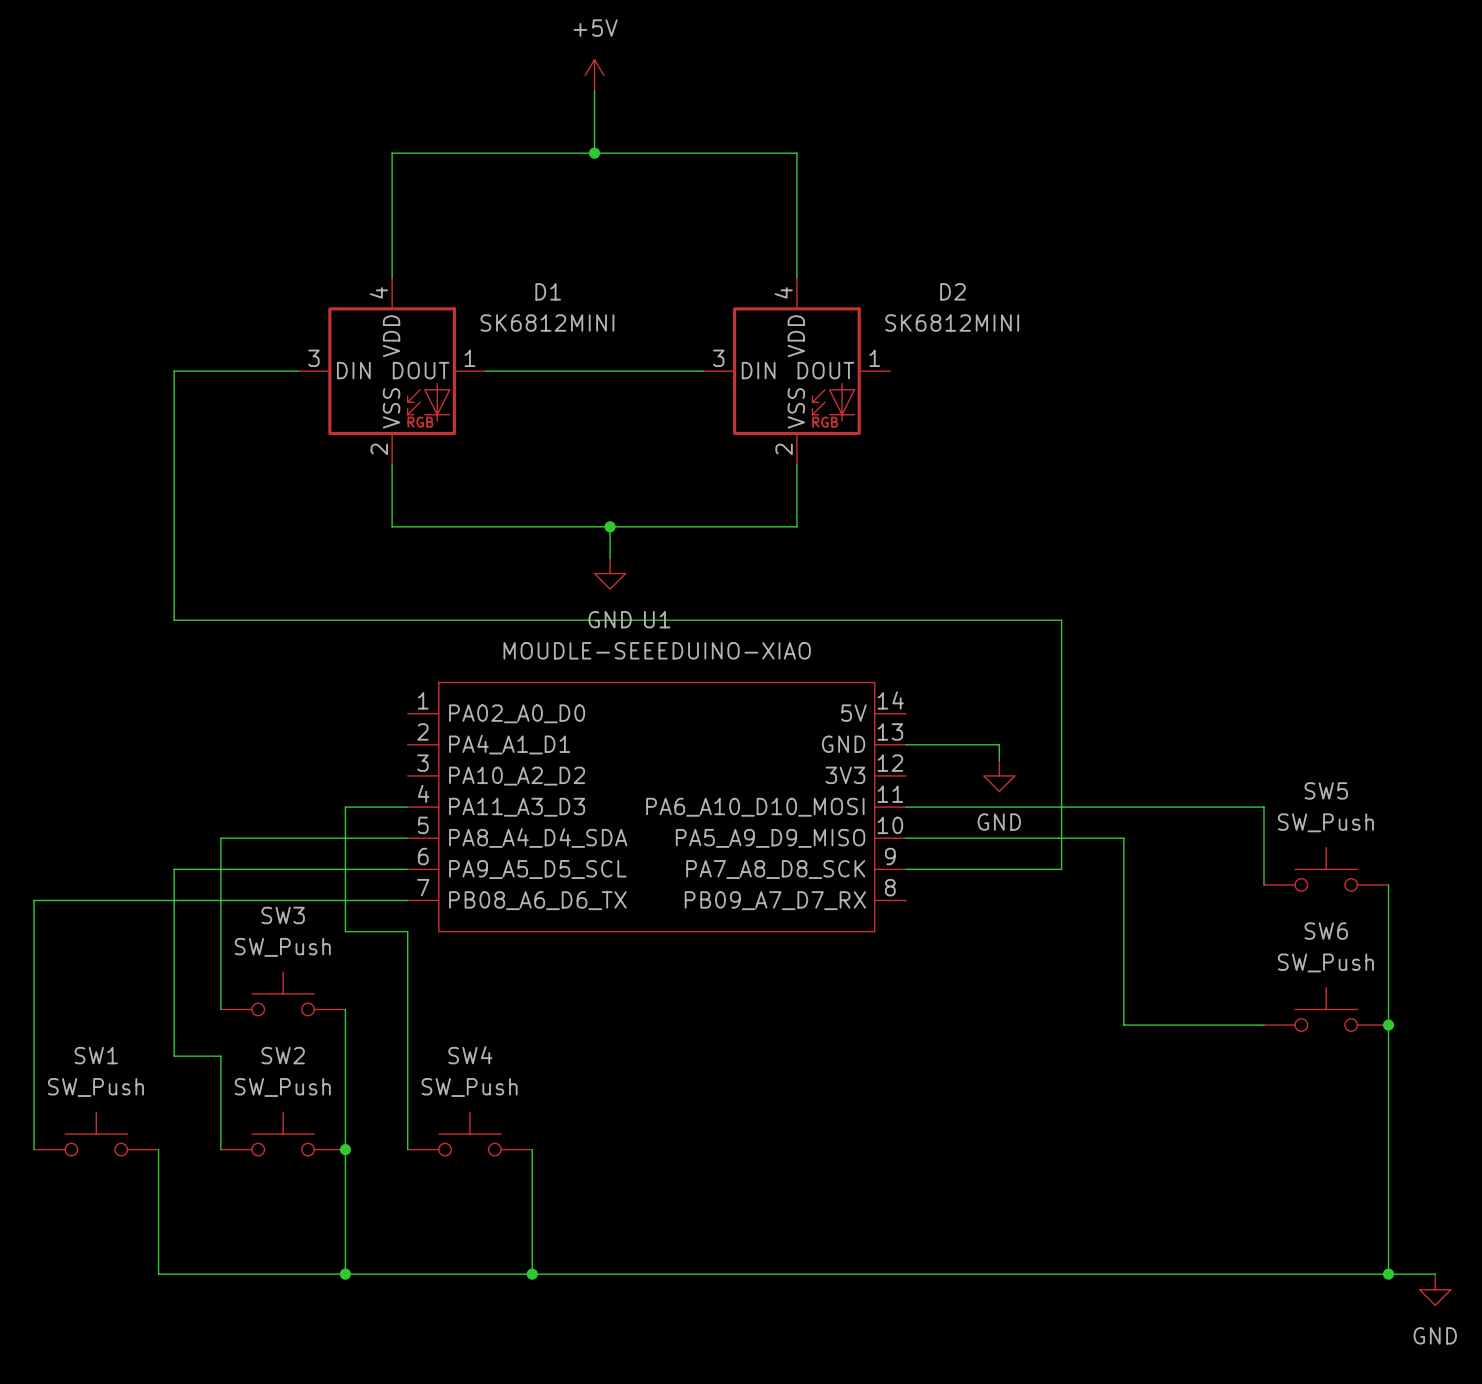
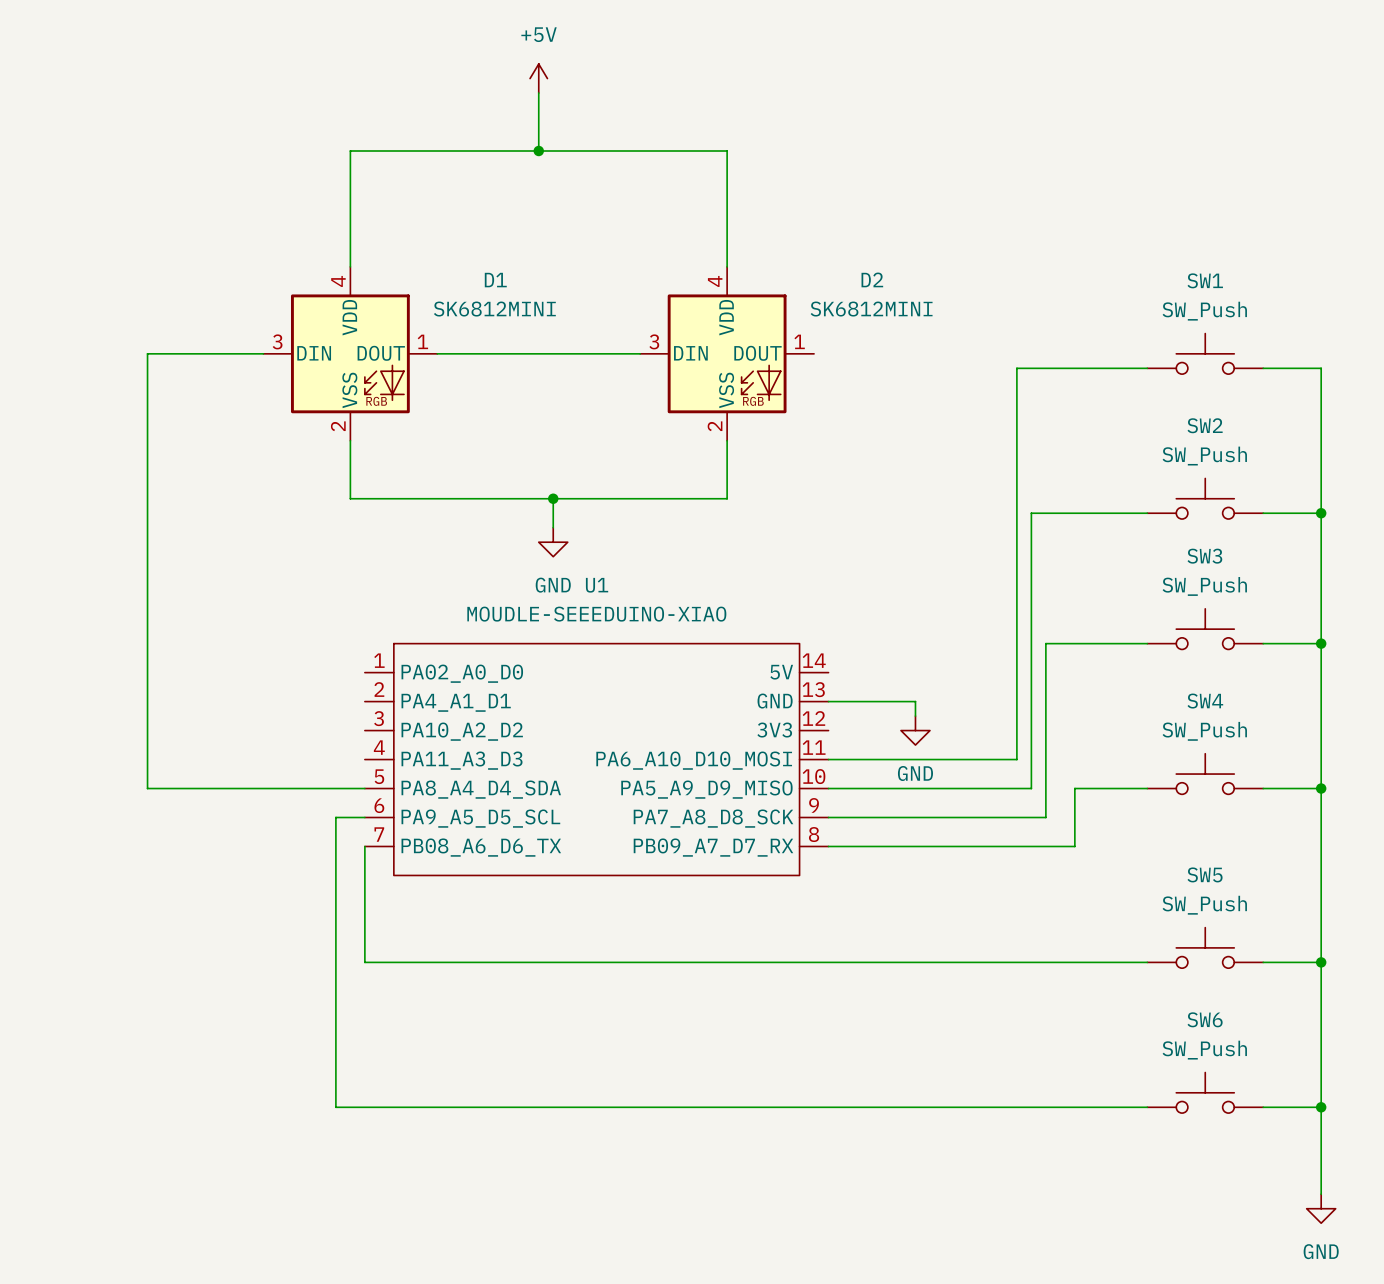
wire: none -> (1263, 513) (1321, 513)
junction: none -> (1321, 513)
wire: (174, 620) (1061, 620) (1061, 869) -> (1147, 643) (1045, 643) (1045, 817) (973, 817)
wire: none -> (1263, 643) (1321, 643)
junction: none -> (1321, 643)
wire: (407, 807) (345, 807) (345, 931) (407, 931) -> (364, 846) (364, 875)
wire: (1108, 807) (1263, 807) (1263, 884) -> (1016, 759) (1016, 368) (1147, 368)
wire: (220, 838) (220, 1009) -> (191, 788) (147, 788) (147, 585)
wire: (1123, 838) (1123, 1025) -> (1031, 788) (1031, 513) (1147, 513)
wire: none -> (1147, 788) (1074, 788) (1074, 846) (828, 846)
wire: none -> (1263, 788) (1321, 788)
junction: none -> (1321, 788)
wire: (376, 869) (174, 869) (174, 1056) (220, 1056) (220, 1149) -> (335, 817) (335, 1107) (1147, 1107)
SW5 position: (1326, 869) -> (1205, 947)
wire: (1388, 884) (1388, 1274) -> none
wire: (407, 900) (34, 900) (34, 1149) -> none
SW3 position: (283, 993) -> (1205, 629)
wire: (345, 1009) (345, 1274) -> none
SW6 position: (1326, 1009) -> (1205, 1092)
wire: (407, 1025) (407, 1149) -> (364, 962) (1031, 962)
wire: none -> (1263, 962) (1321, 962)
junction position: (1388, 1025) -> (1321, 962)
SW1 position: (96, 1134) -> (1205, 353)
SW2 position: (283, 1134) -> (1205, 498)
SW4 position: (469, 1134) -> (1205, 774)
wire: (158, 1149) (158, 1274) (1435, 1274) -> (1263, 368) (1321, 368) (1321, 1194)
junction: (345, 1149) -> none
wire: (532, 1149) (532, 1274) -> none
wire: none -> (1263, 1107) (1321, 1107)
junction: none -> (1321, 1107)
junction: (345, 1274) -> none
junction: (532, 1274) -> none
junction: (1388, 1274) -> none

